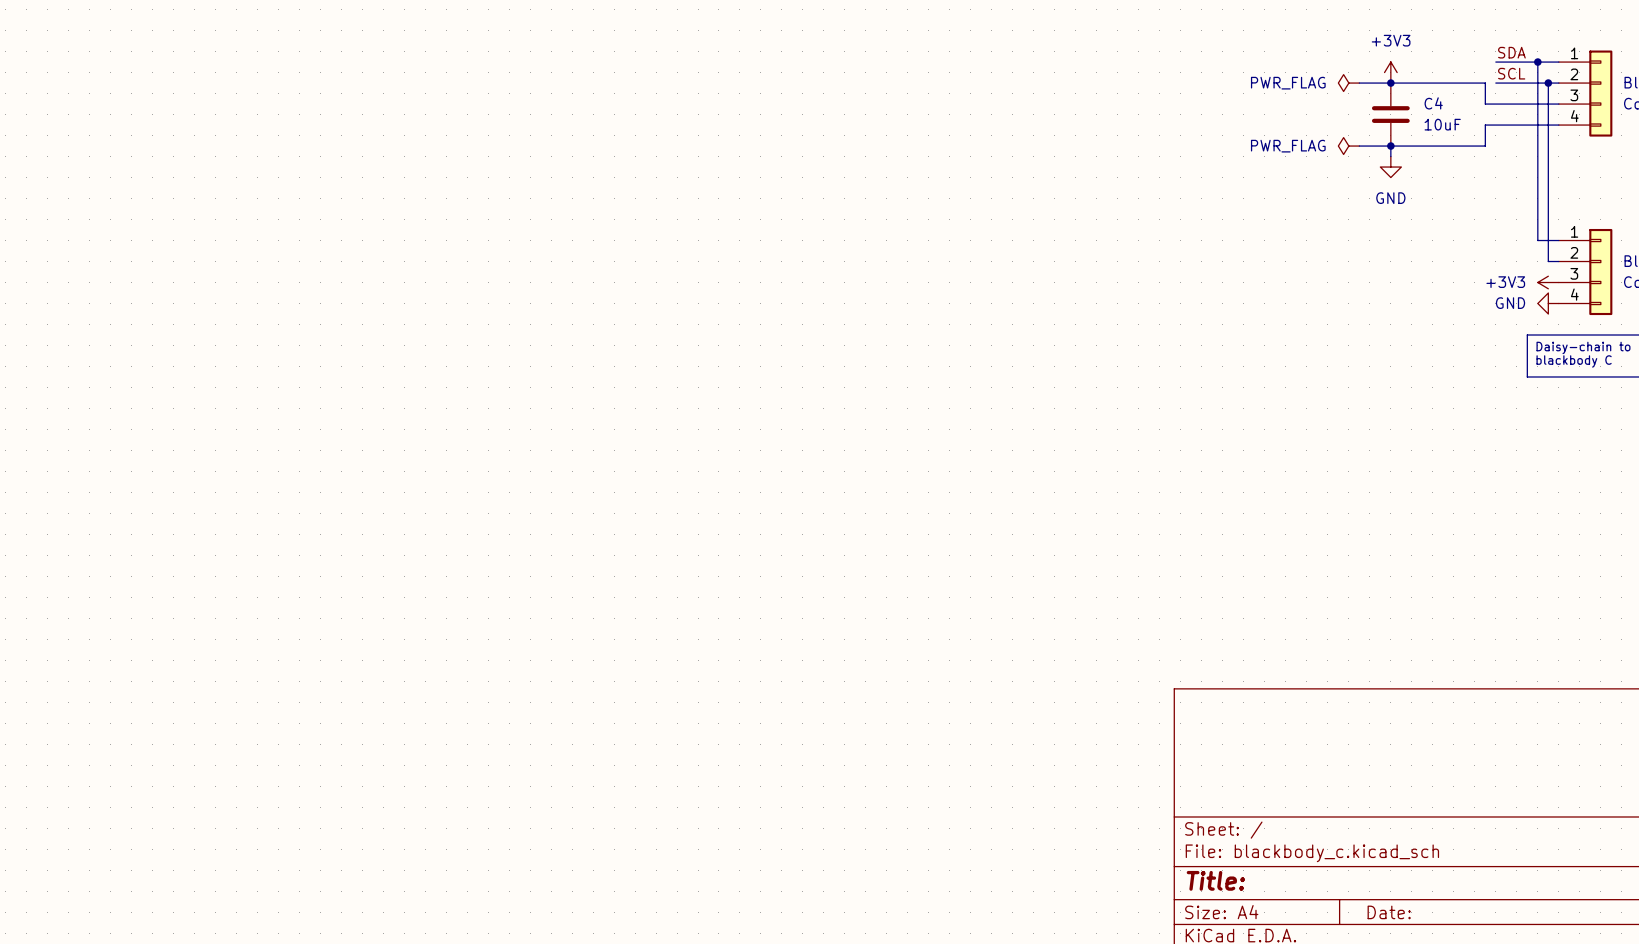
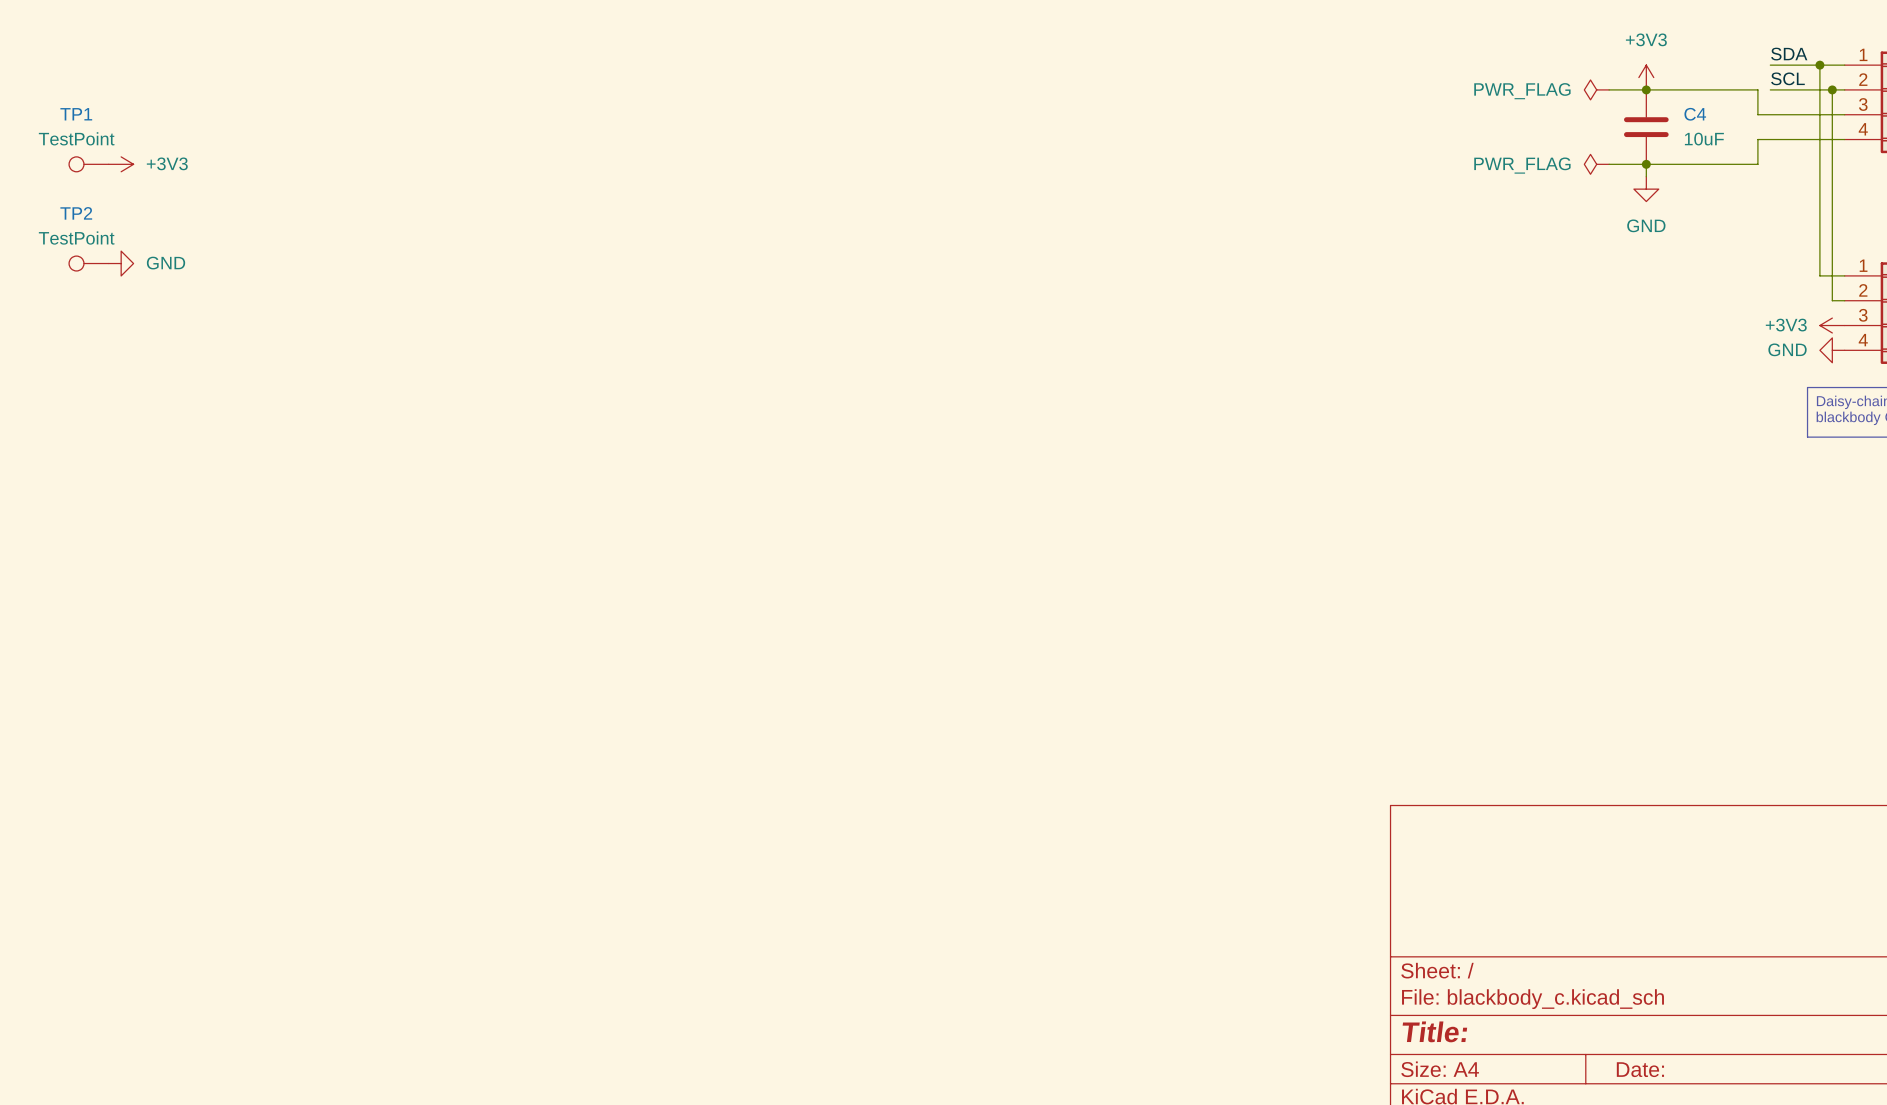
TP1: none -> TestPoint (88, 164)
power symbol: none -> +3V3 (121, 164)
TP2: none -> TestPoint (88, 263)
power symbol: none -> GND (121, 263)

